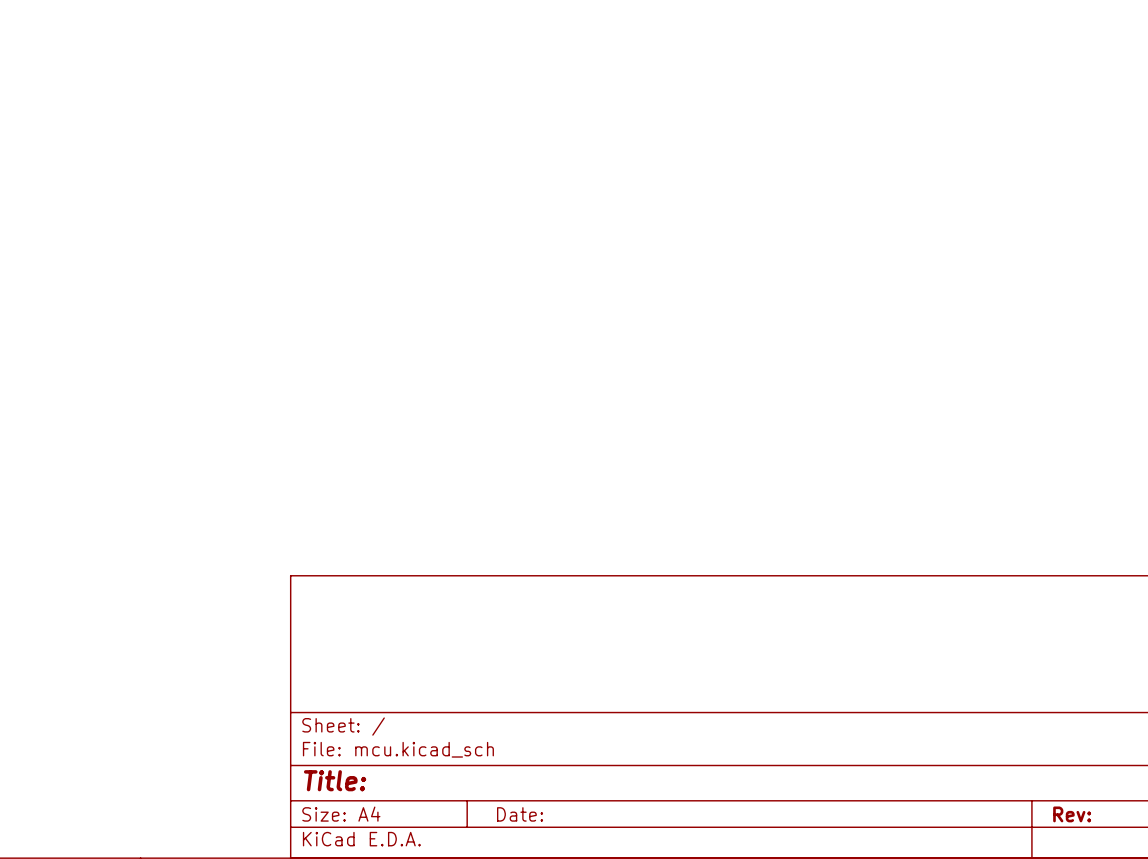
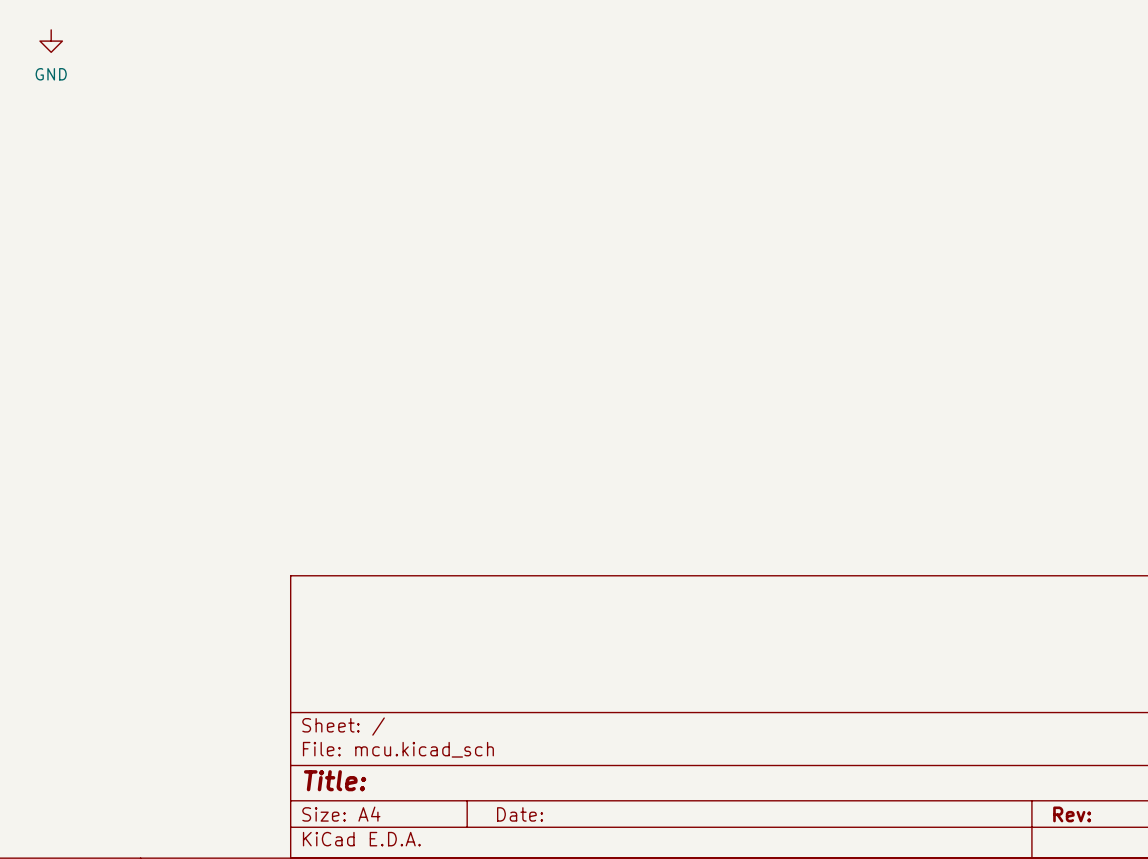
power symbol: none -> GND (51, 41)

